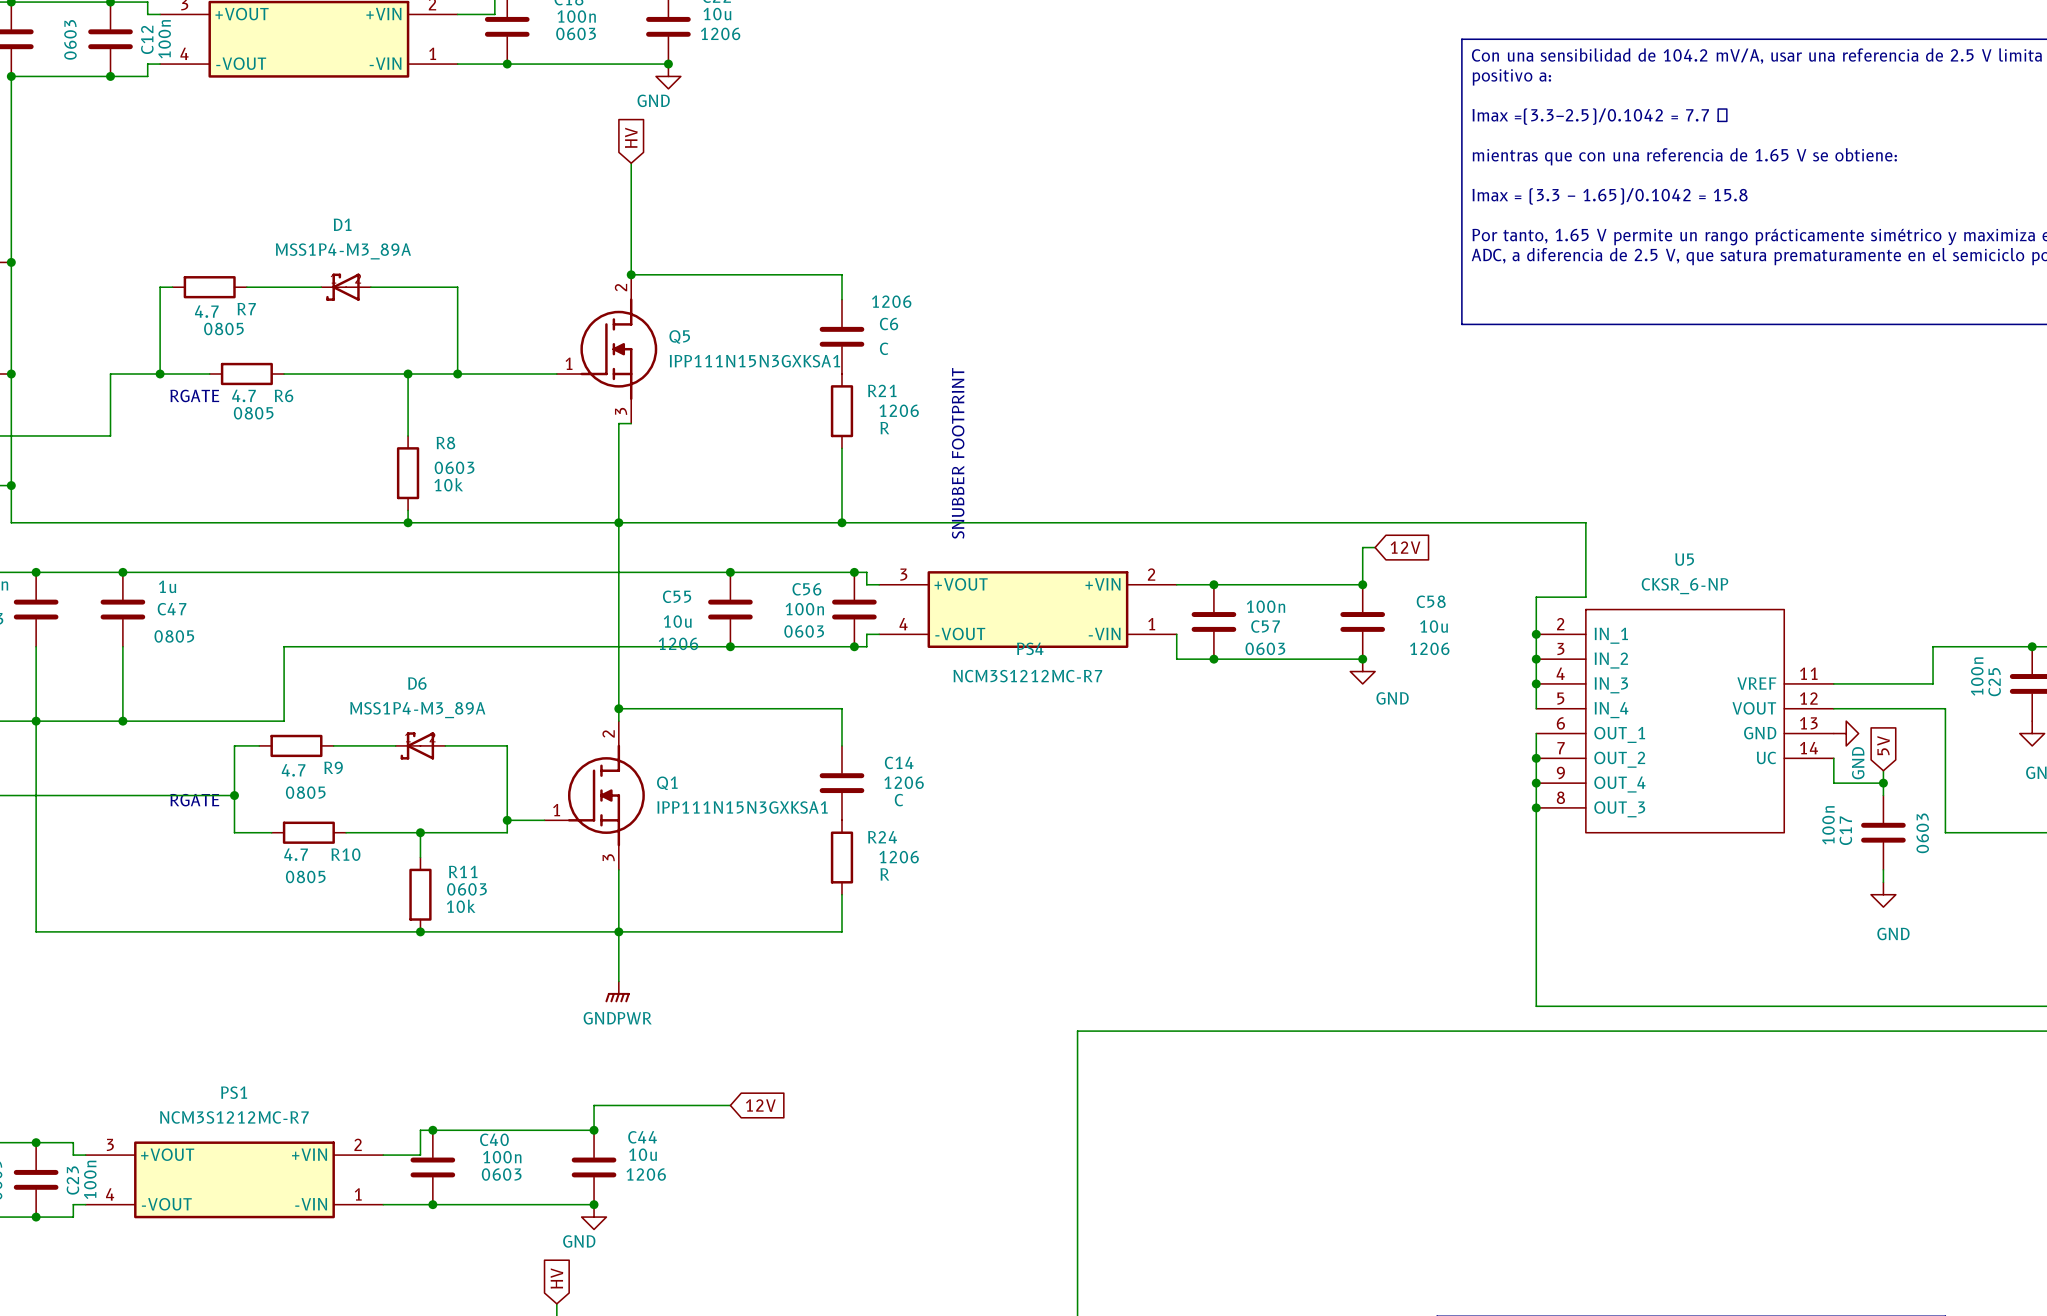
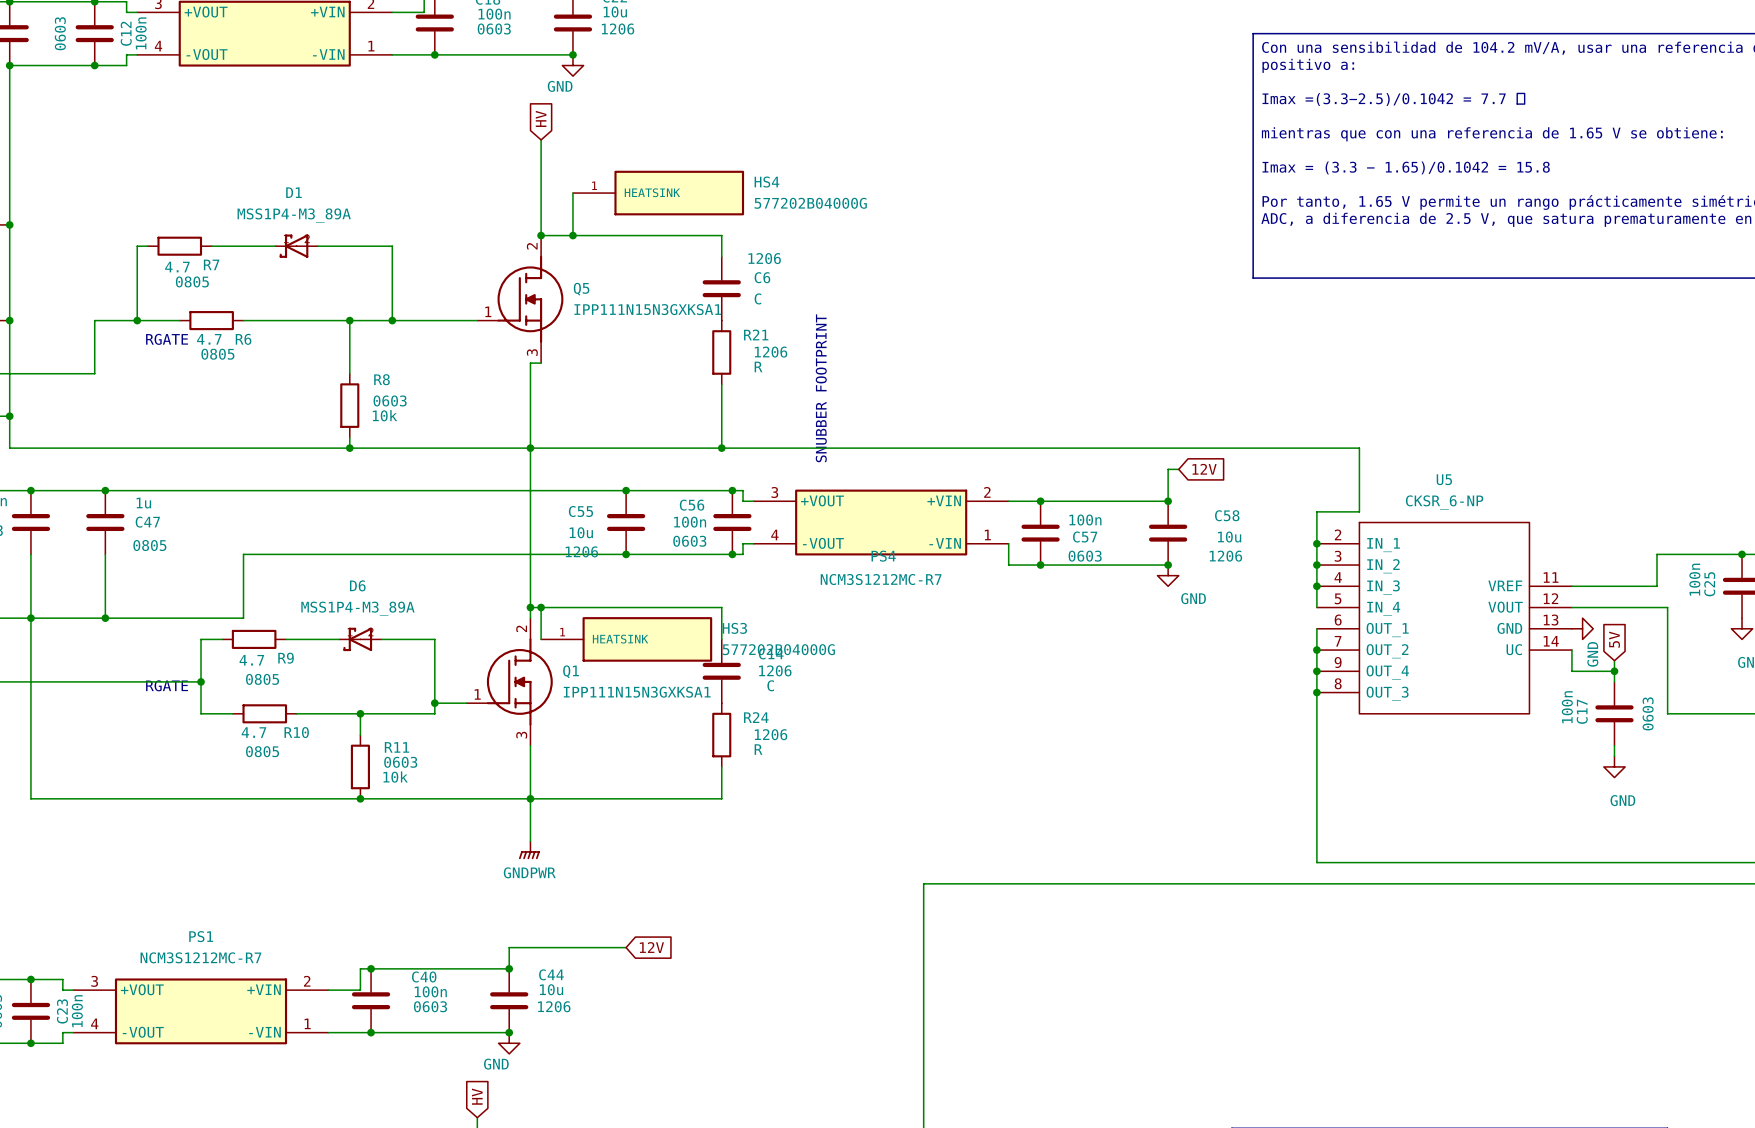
wire: none -> (572, 193) (572, 235)
HS4: none -> 577202B04000G (658, 193)
junction: none -> (572, 235)
wire: none -> (541, 607) (541, 639)
junction: none -> (541, 607)
HS3: none -> 577202B04000G (626, 639)

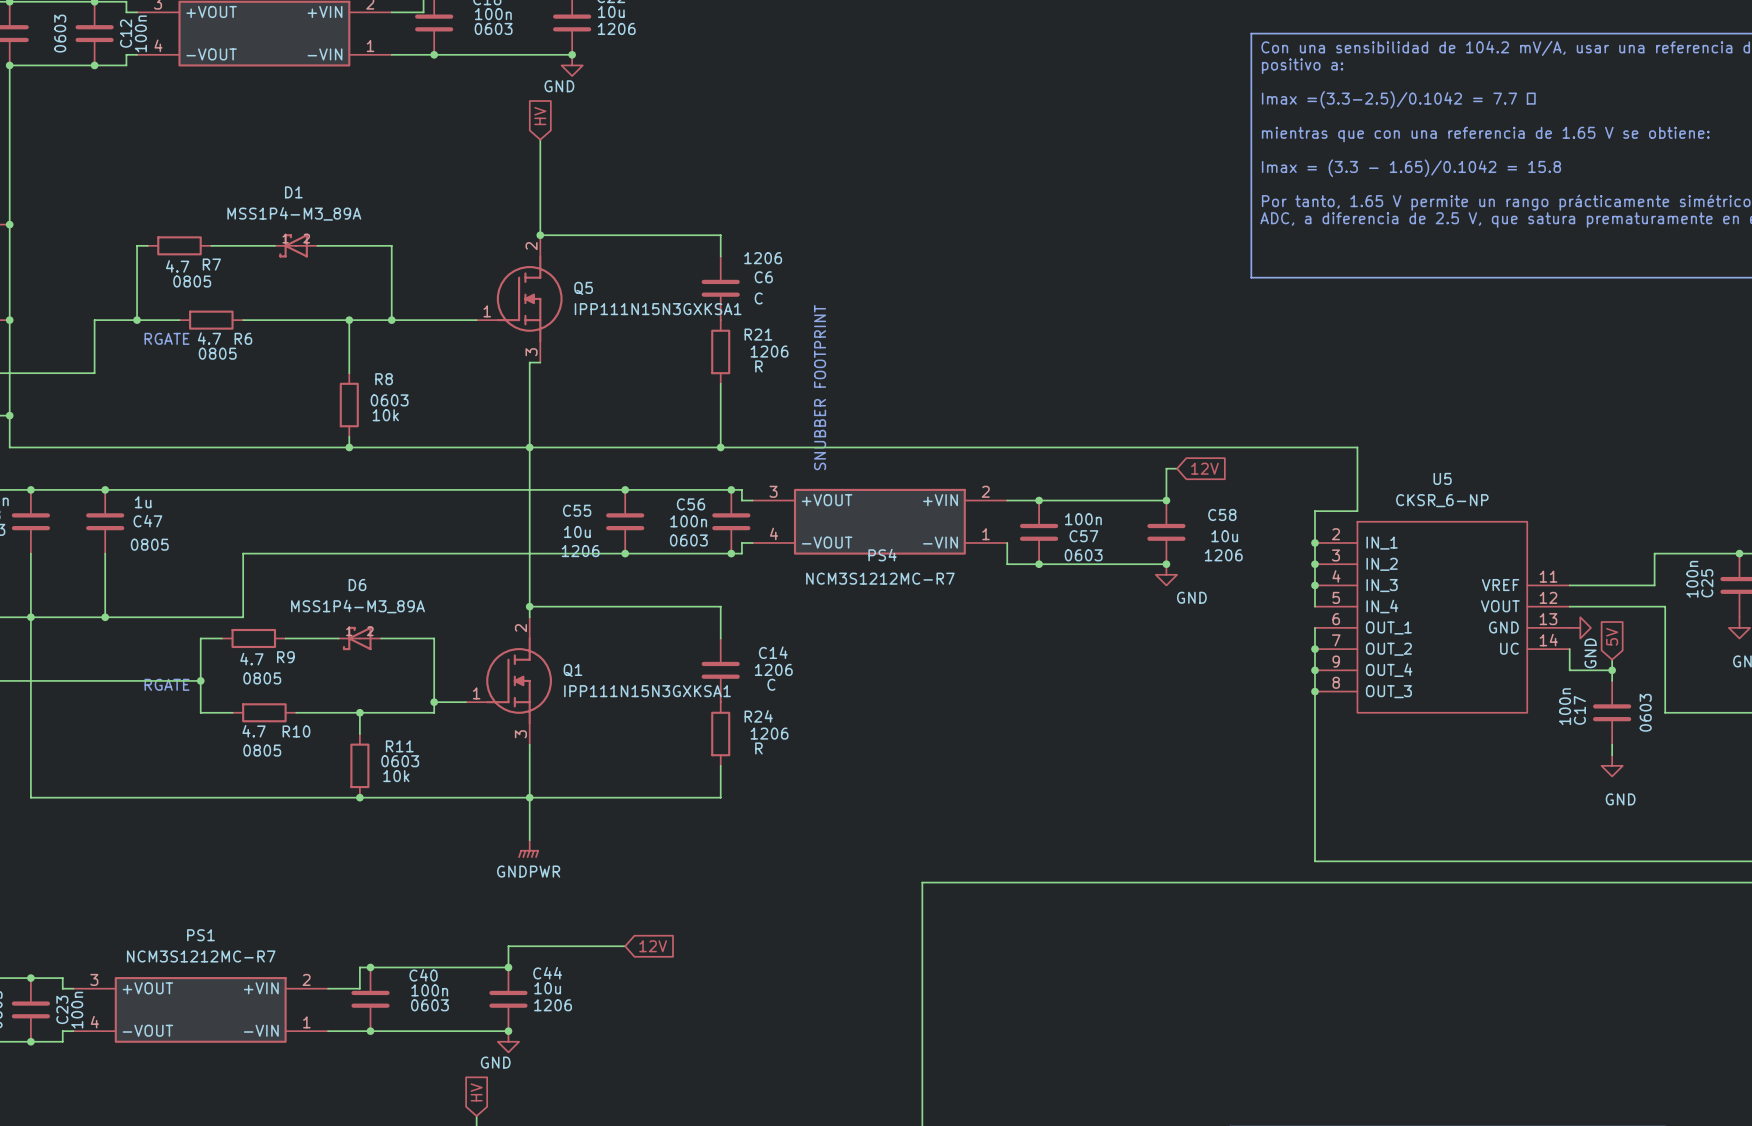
wire: (572, 193) (572, 235) -> none
HS4: 577202B04000G (658, 193) -> none
junction: (572, 235) -> none
wire: (541, 607) (541, 639) -> none
junction: (541, 607) -> none
HS3: 577202B04000G (626, 639) -> none

